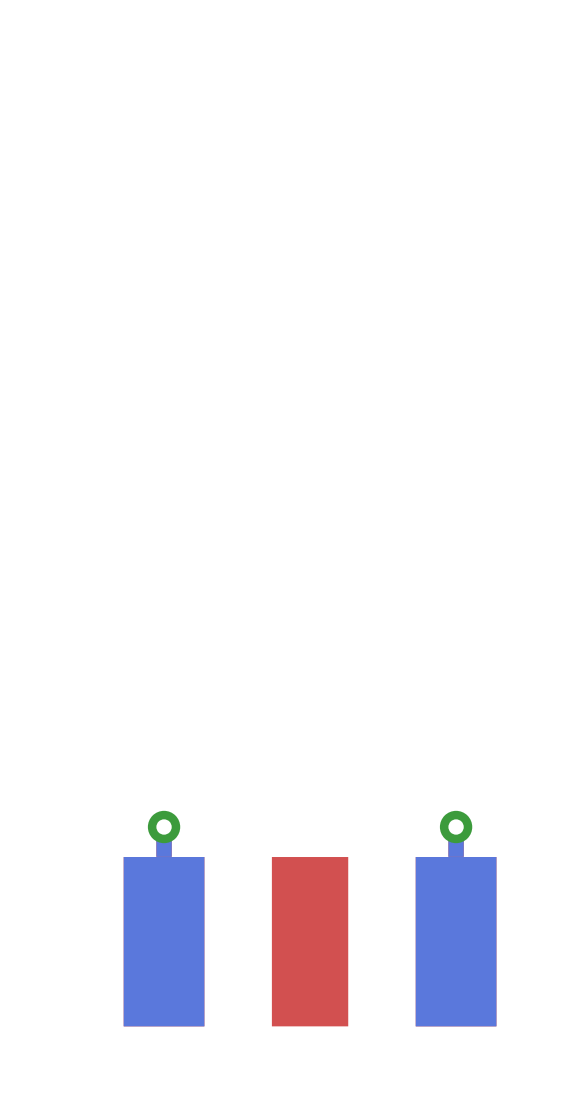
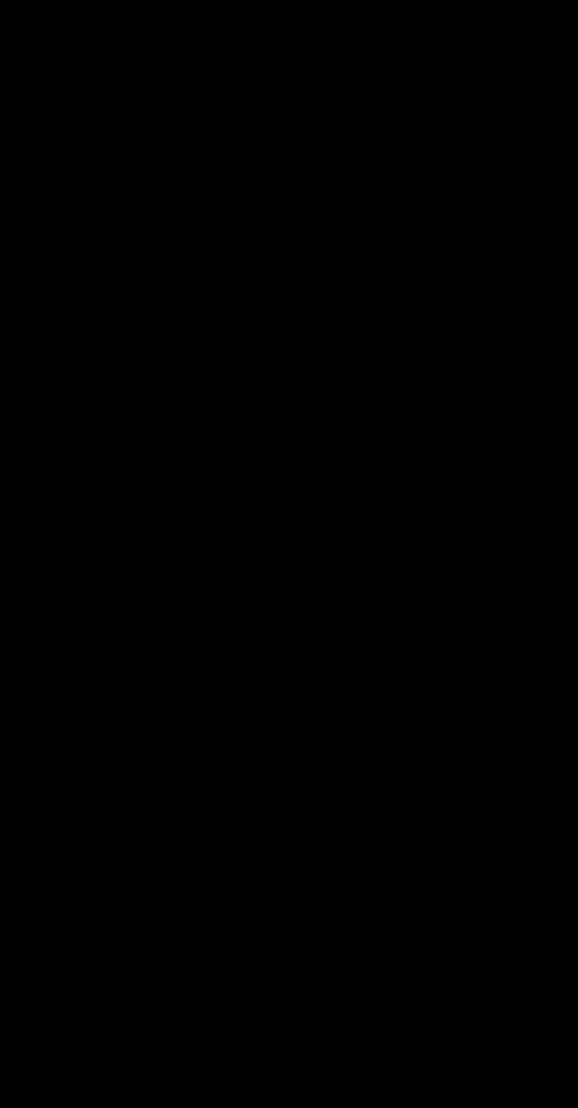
part: (310, 918) -> none

